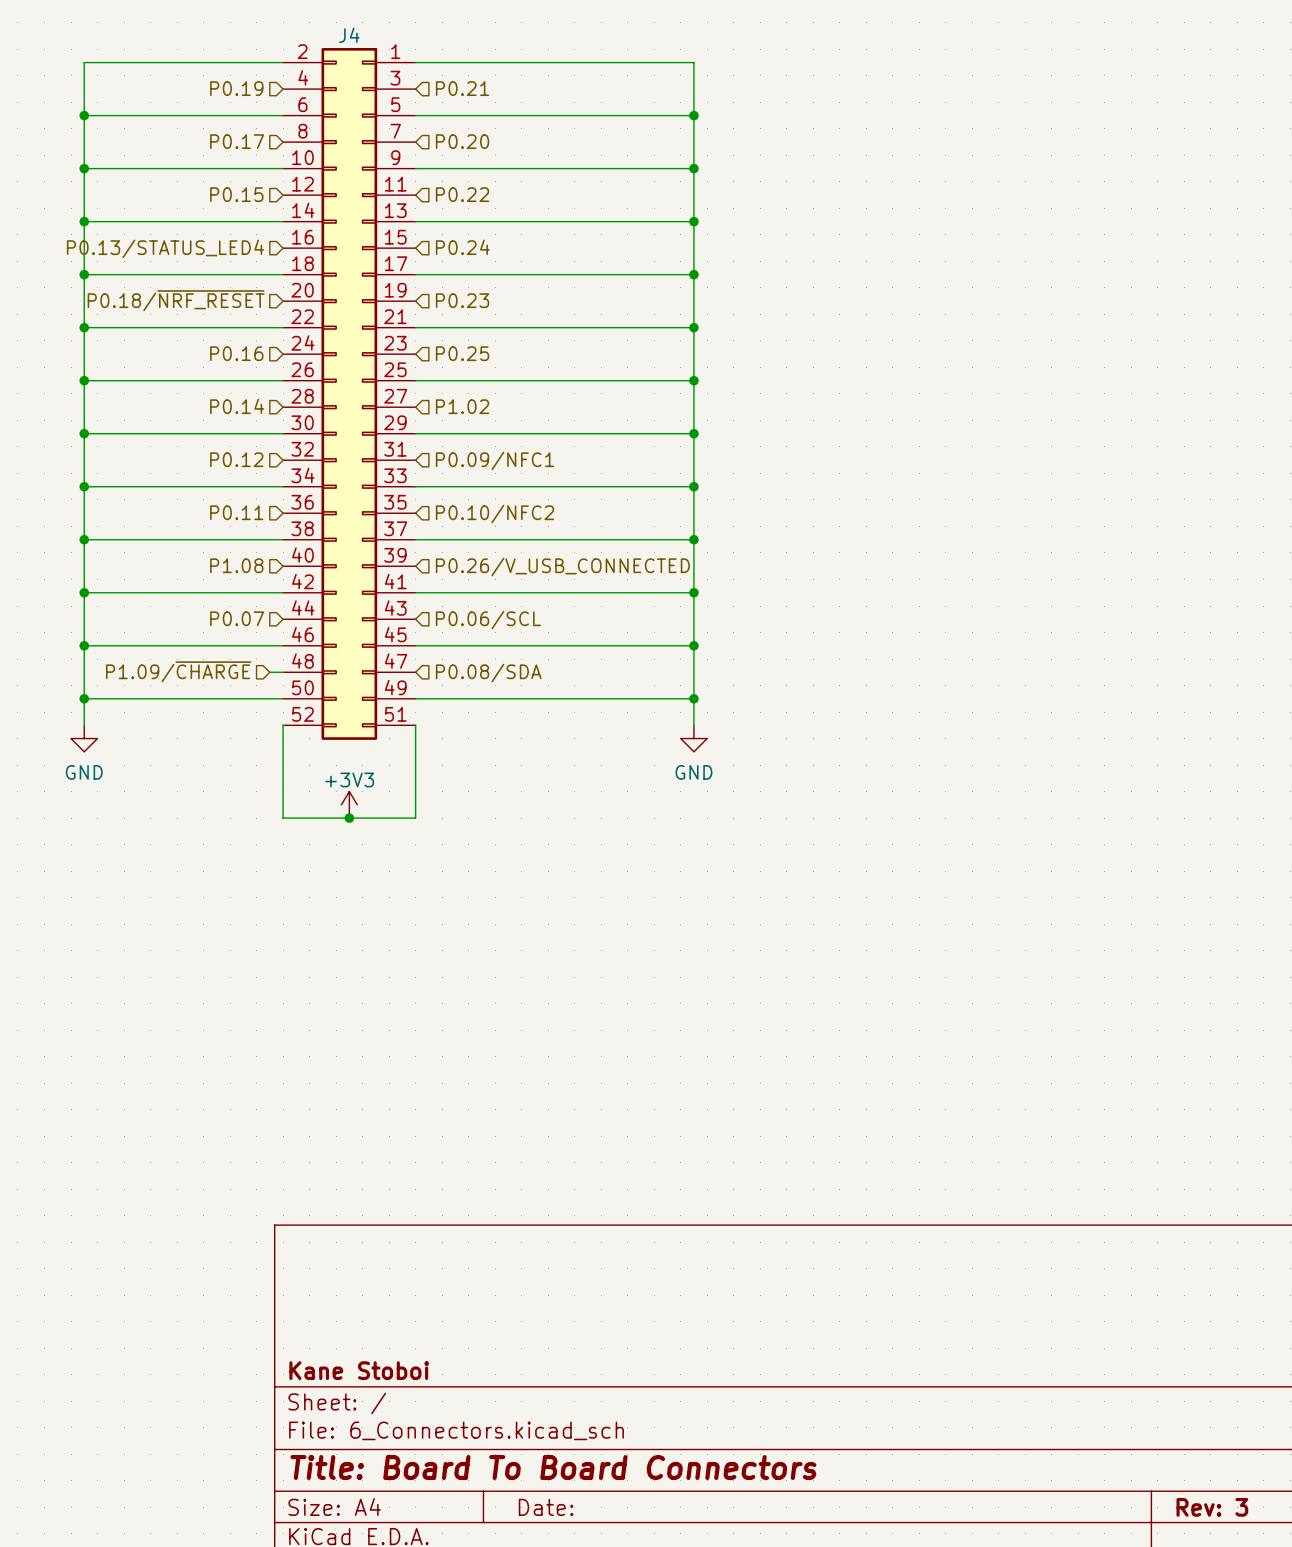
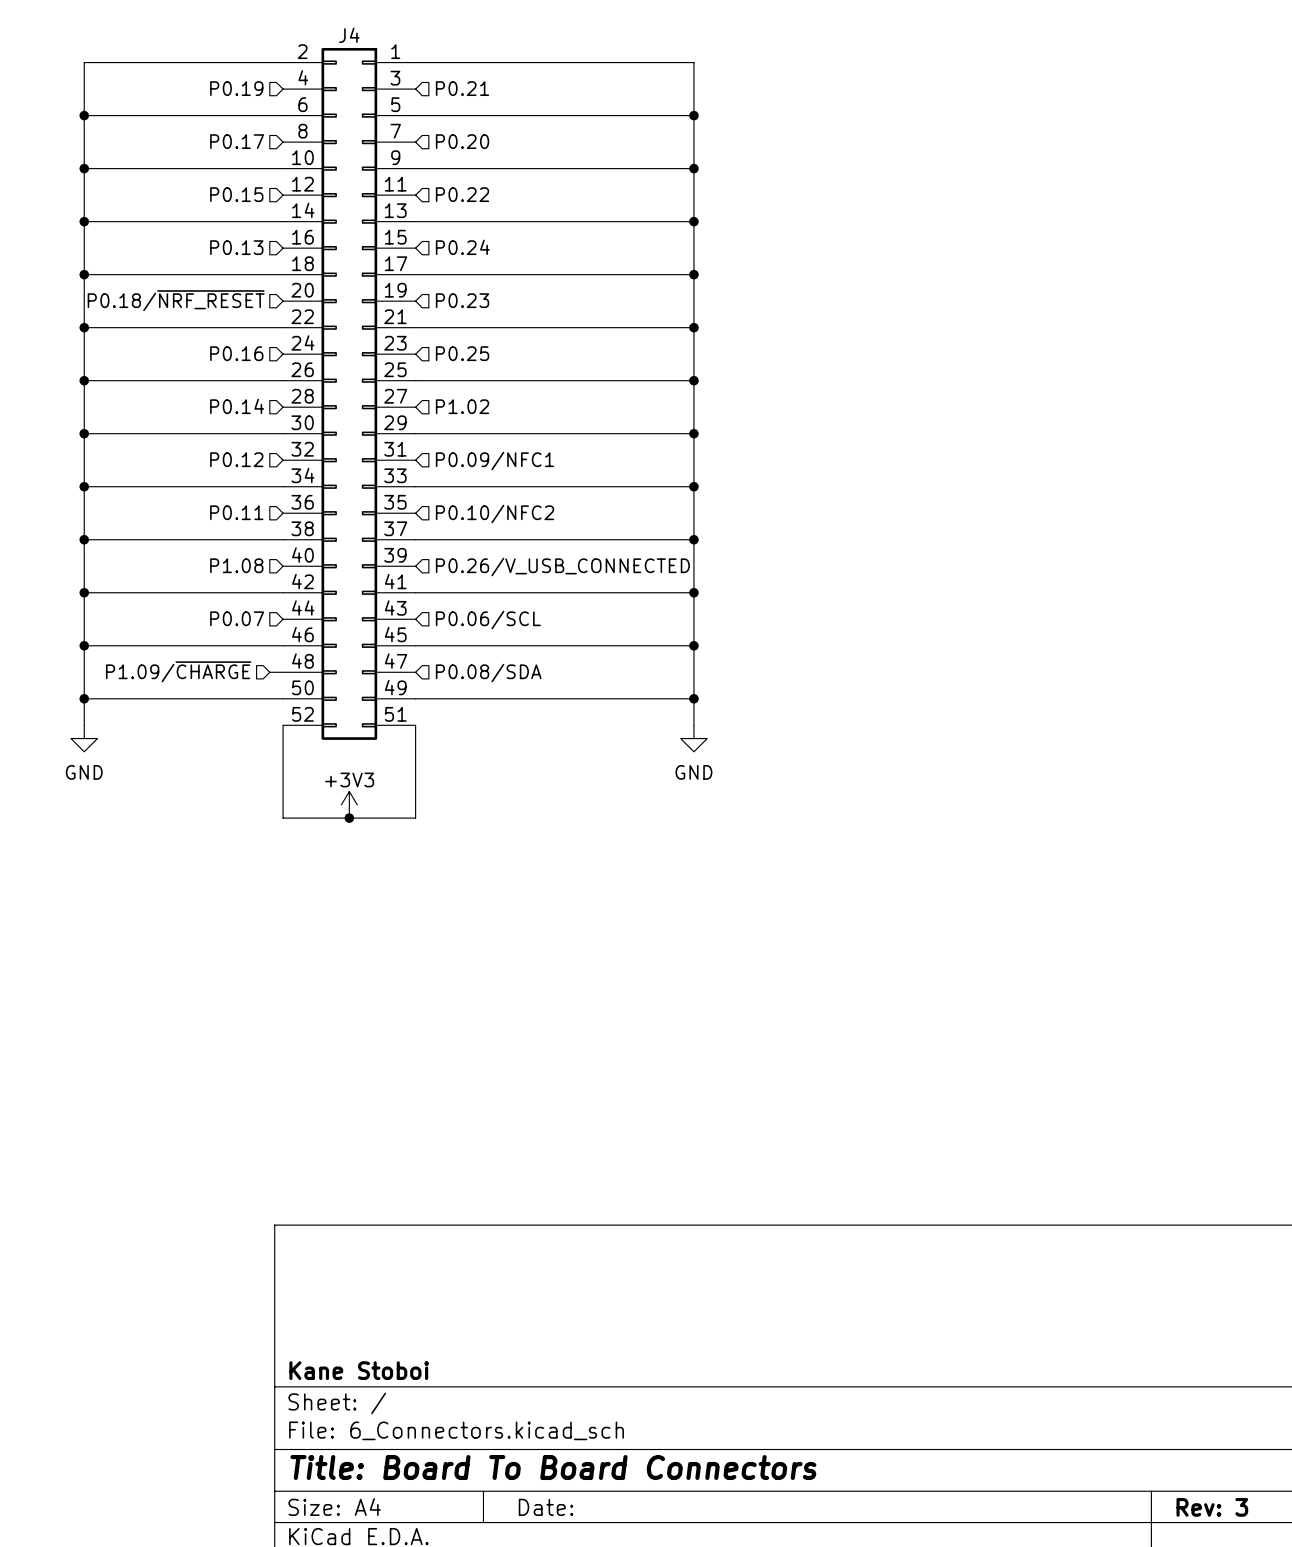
hierarchical label: P0.13/STATUS_LED4 (165, 248) -> P0.13 (236, 247)

